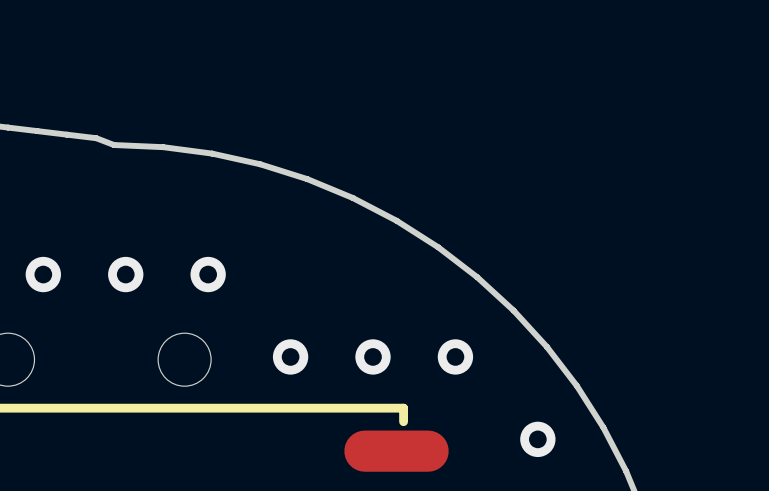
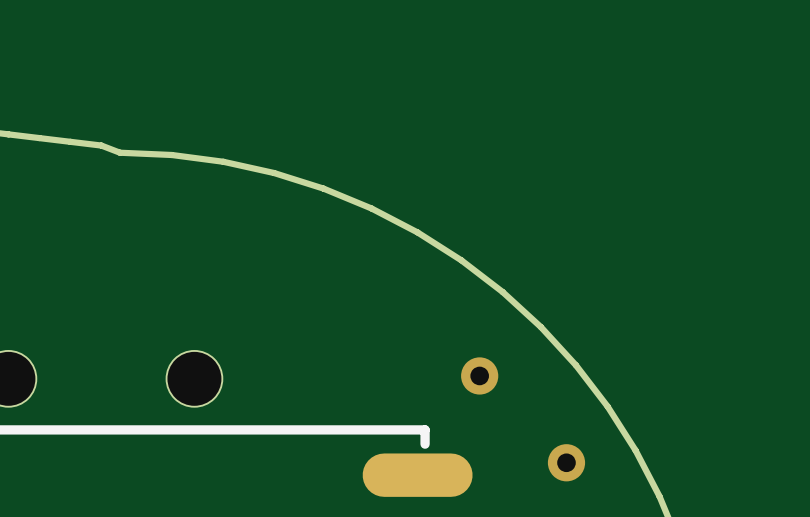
via: (43, 274) -> none
via: (125, 274) -> none
via: (208, 274) -> none
via: (290, 356) -> none
via: (373, 356) -> none

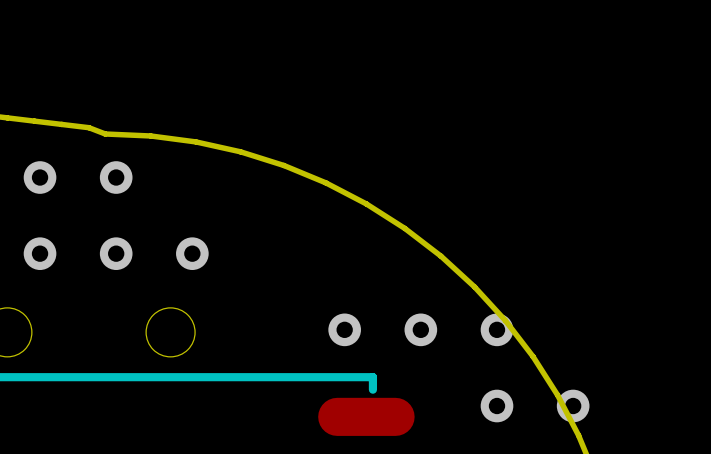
via: none -> (40, 177)
via: none -> (116, 177)
via: none -> (40, 253)
via: none -> (116, 253)
via: none -> (192, 253)
via: none -> (344, 329)
via: none -> (497, 329)
via: none -> (573, 406)

